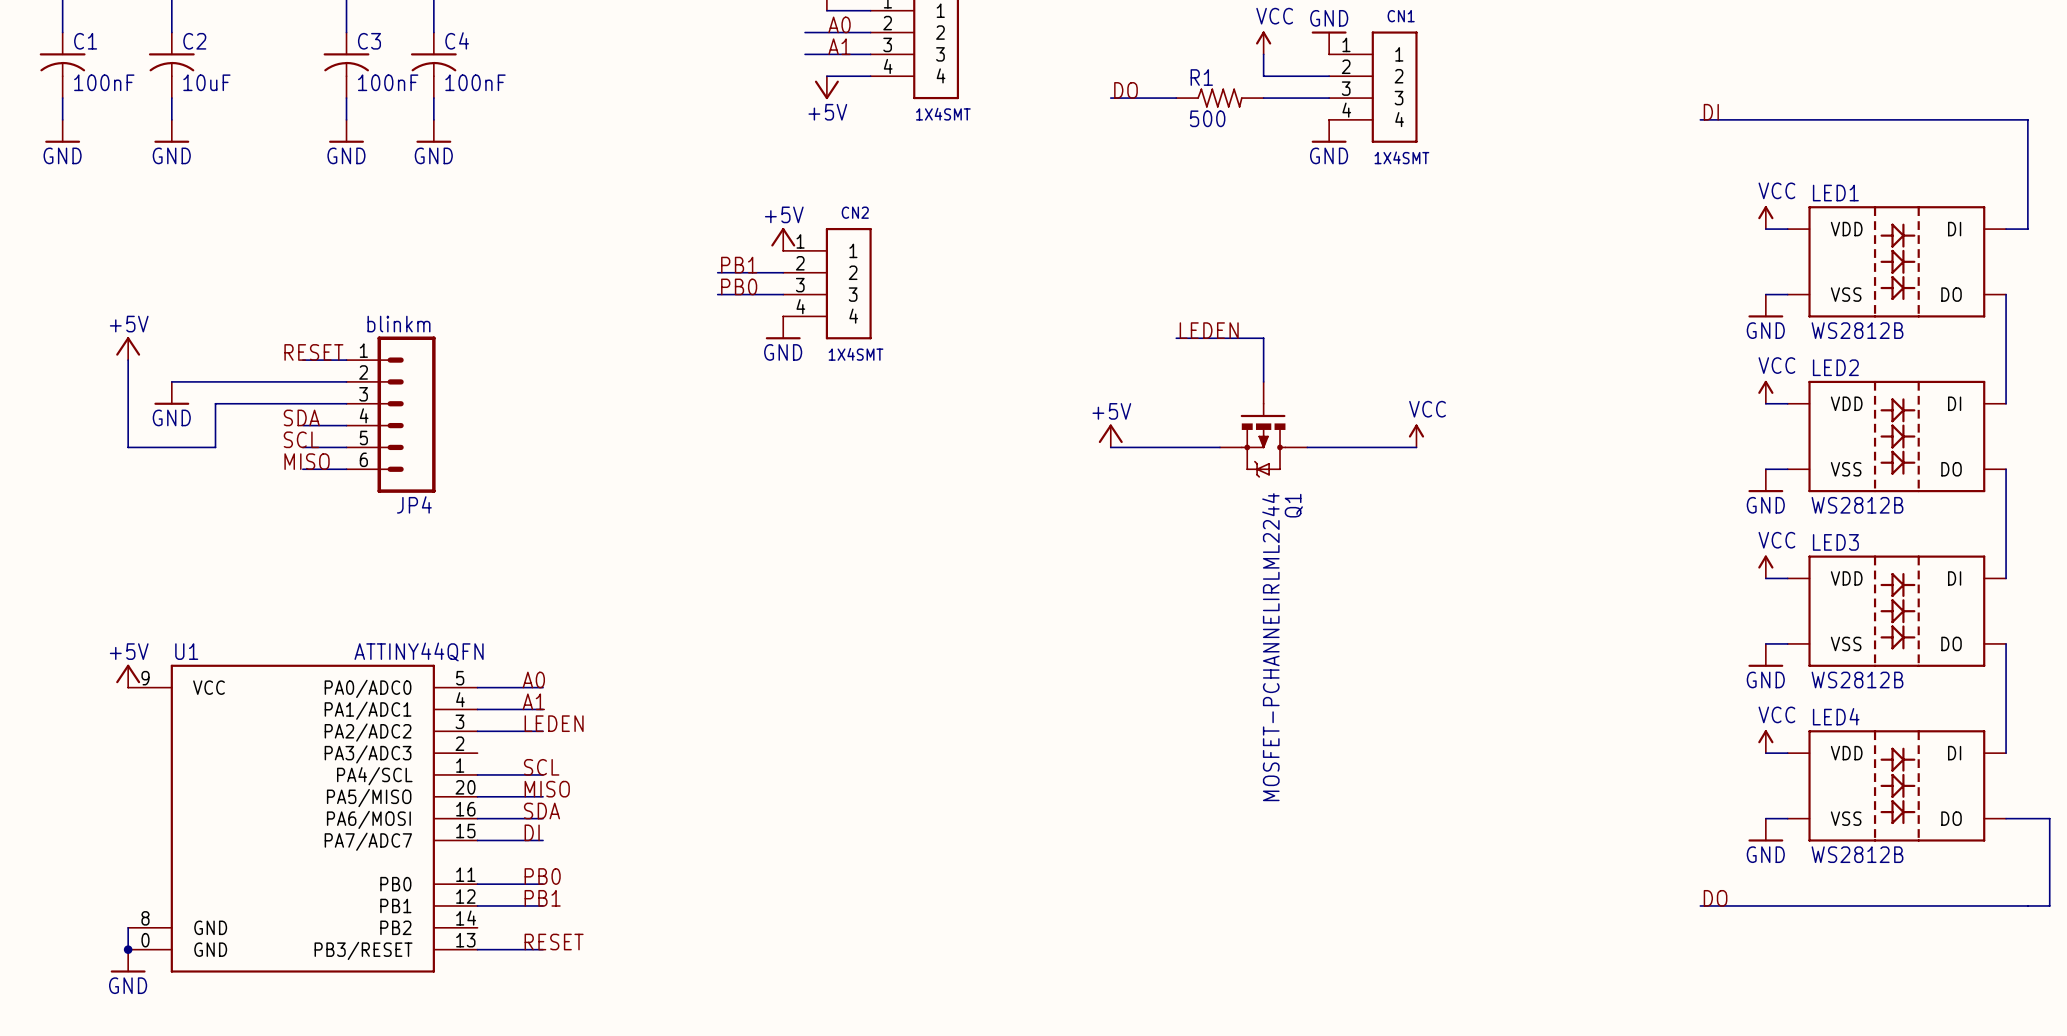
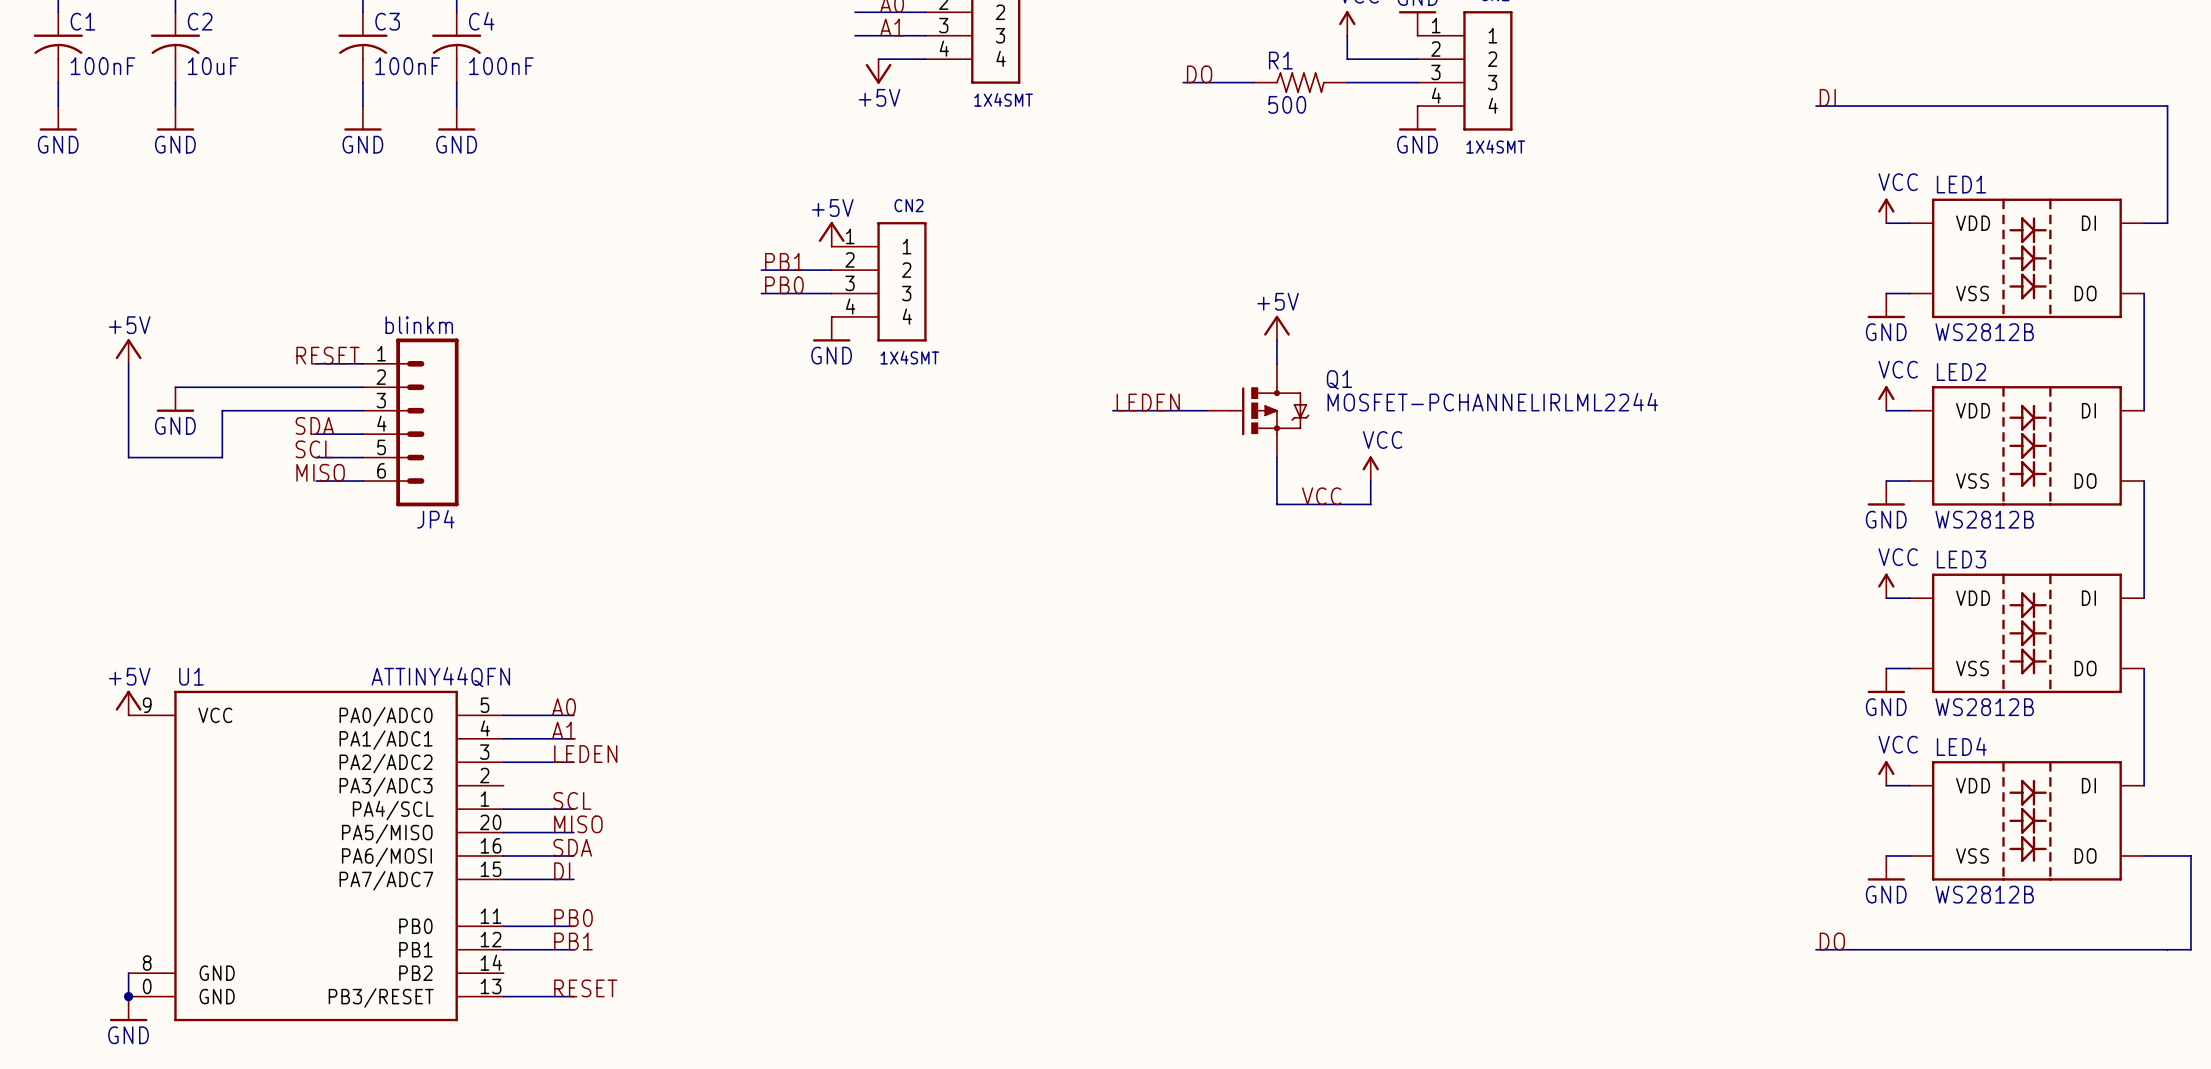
label position: LEDEN (1209, 330) -> LEDEN (1148, 402)
wire: (1176, 338) (1263, 338) (1263, 381) -> none
wire: none -> (1276, 340) (1276, 363)
wire: none -> (1112, 410) (1206, 410)
Q1 position: (1263, 429) -> (1257, 410)
power symbol position: +5V (1110, 435) -> +5V (1276, 328)
power symbol position: VCC (1416, 435) -> VCC (1370, 468)
Q1 rotation: 0° (1263, 440) -> 90° counterclockwise (1269, 410)
wire: (1110, 447) (1219, 447) -> none
wire: none -> (1276, 457) (1276, 504) (1370, 504) (1370, 481)
wire: (1307, 447) (1416, 447) -> none
label: none -> VCC (1321, 496)

